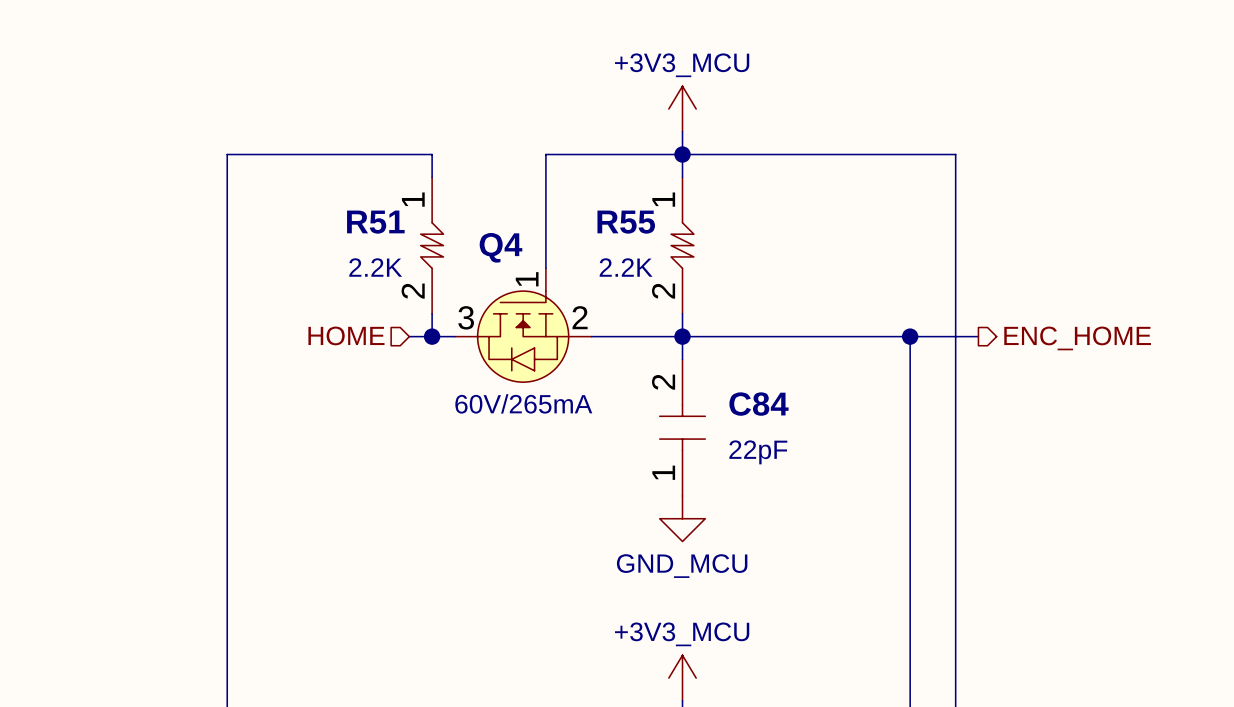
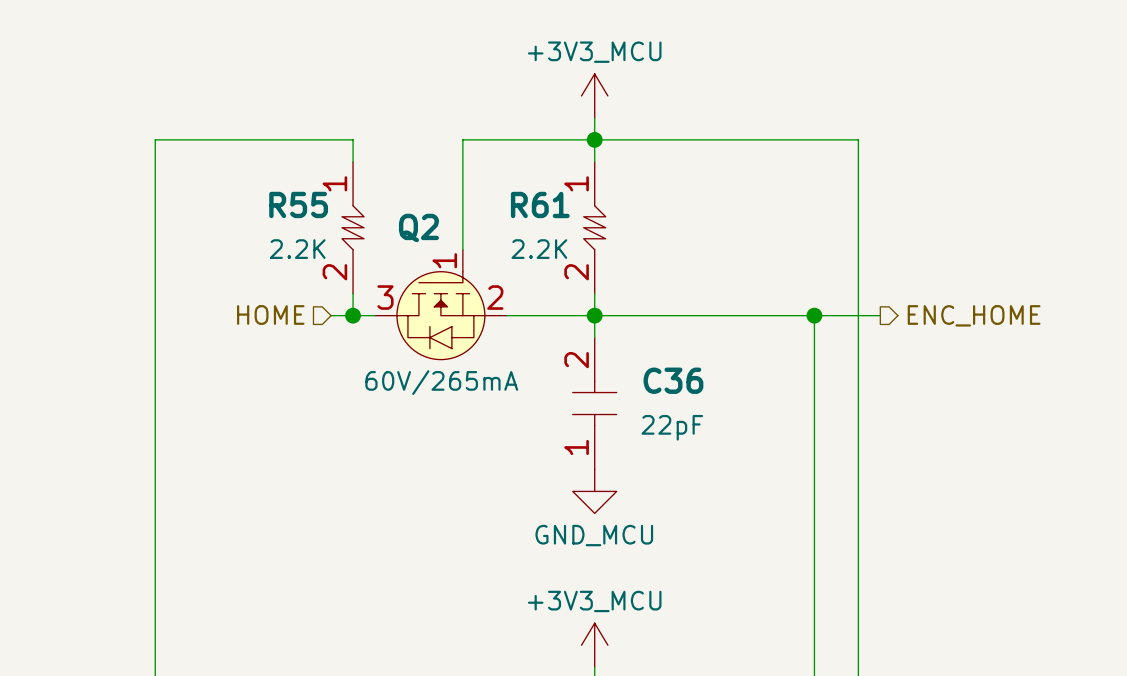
R51 name: R51 (375, 222) -> R55 (298, 204)
R55 name: R55 (626, 222) -> R61 (540, 204)
Q4 name: Q4 (500, 247) -> Q2 (418, 227)
C84 name: C84 (758, 404) -> C36 (673, 380)

